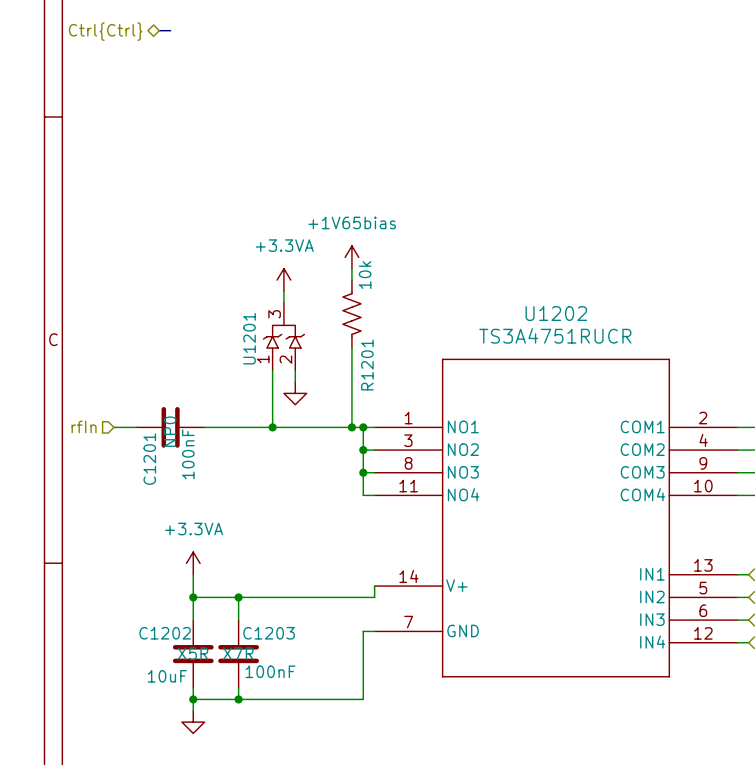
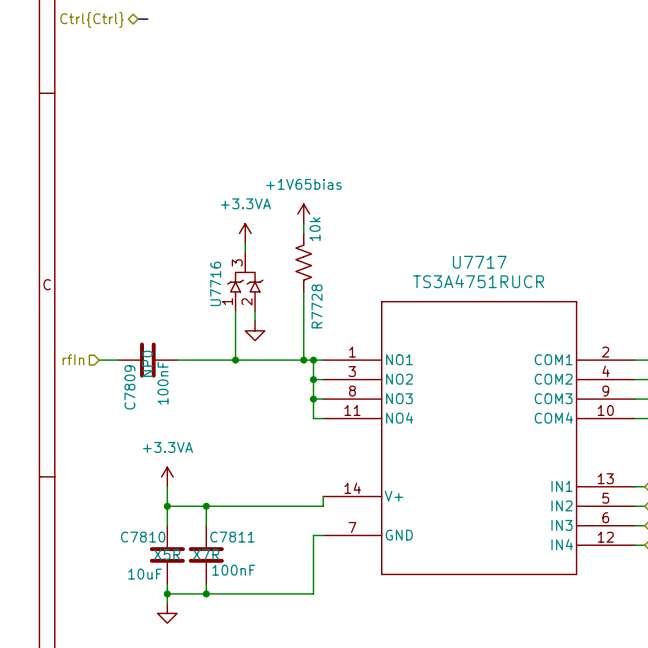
U1202 name: U1202 (556, 313) -> U7717 (479, 262)
U1201 name: U1201 (249, 338) -> U7716 (215, 283)
R1201 name: R1201 (367, 364) -> R7728 (317, 306)
C1201 name: C1201 (149, 459) -> C7809 (129, 387)
C1202 name: C1202 (165, 633) -> C7810 (143, 537)
C1203 name: C1203 (269, 633) -> C7811 (232, 537)

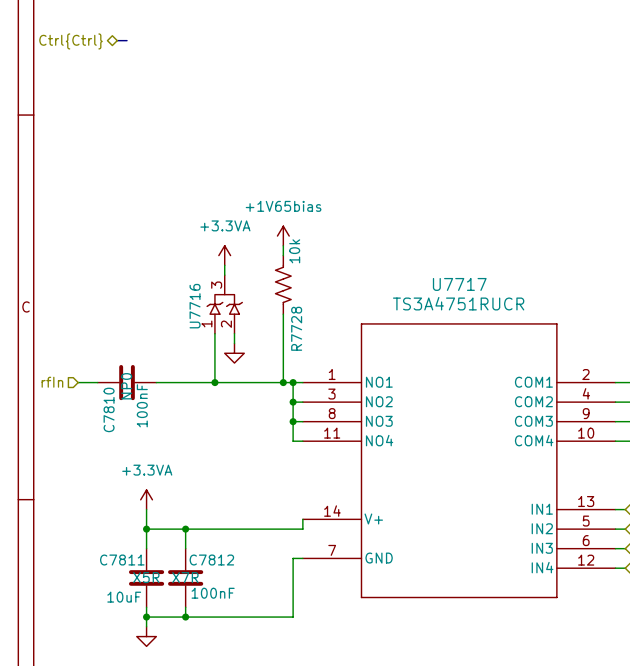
C7809 name: C7809 (129, 387) -> C7810 (109, 409)
C7810 name: C7810 (143, 537) -> C7811 (122, 560)
C7811 name: C7811 (232, 537) -> C7812 (211, 560)

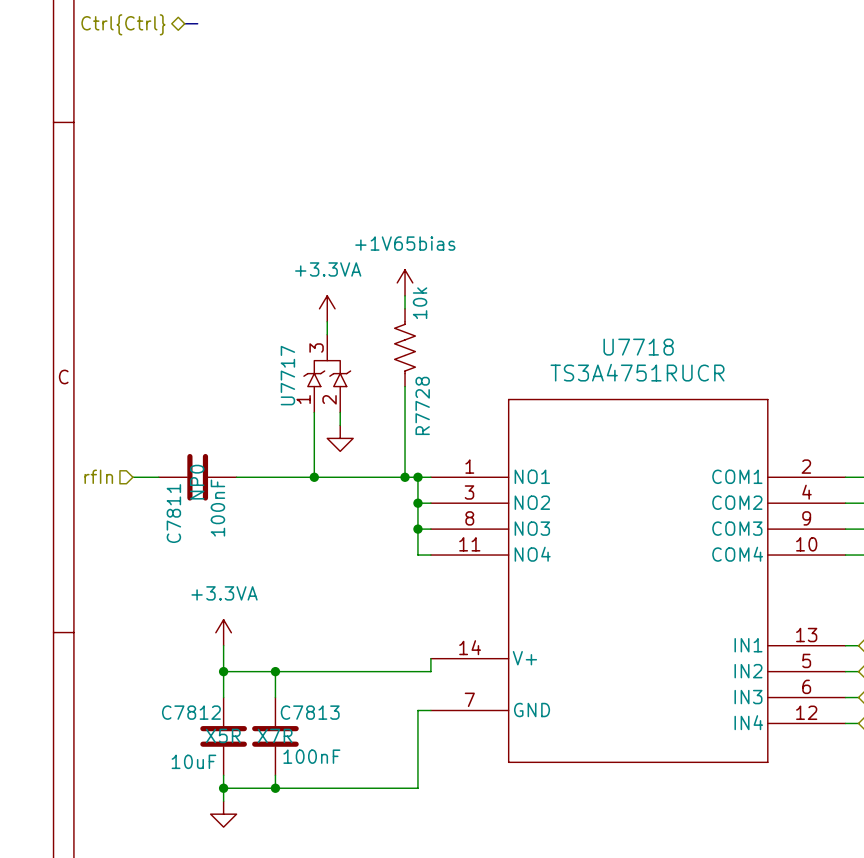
U7717 name: U7717 (459, 284) -> U7718 (638, 347)
U7716 name: U7716 (195, 306) -> U7717 (287, 375)
C7810 name: C7810 (109, 409) -> C7811 (173, 513)
C7811 name: C7811 (122, 560) -> C7812 (191, 712)
C7812 name: C7812 (211, 560) -> C7813 (310, 712)

